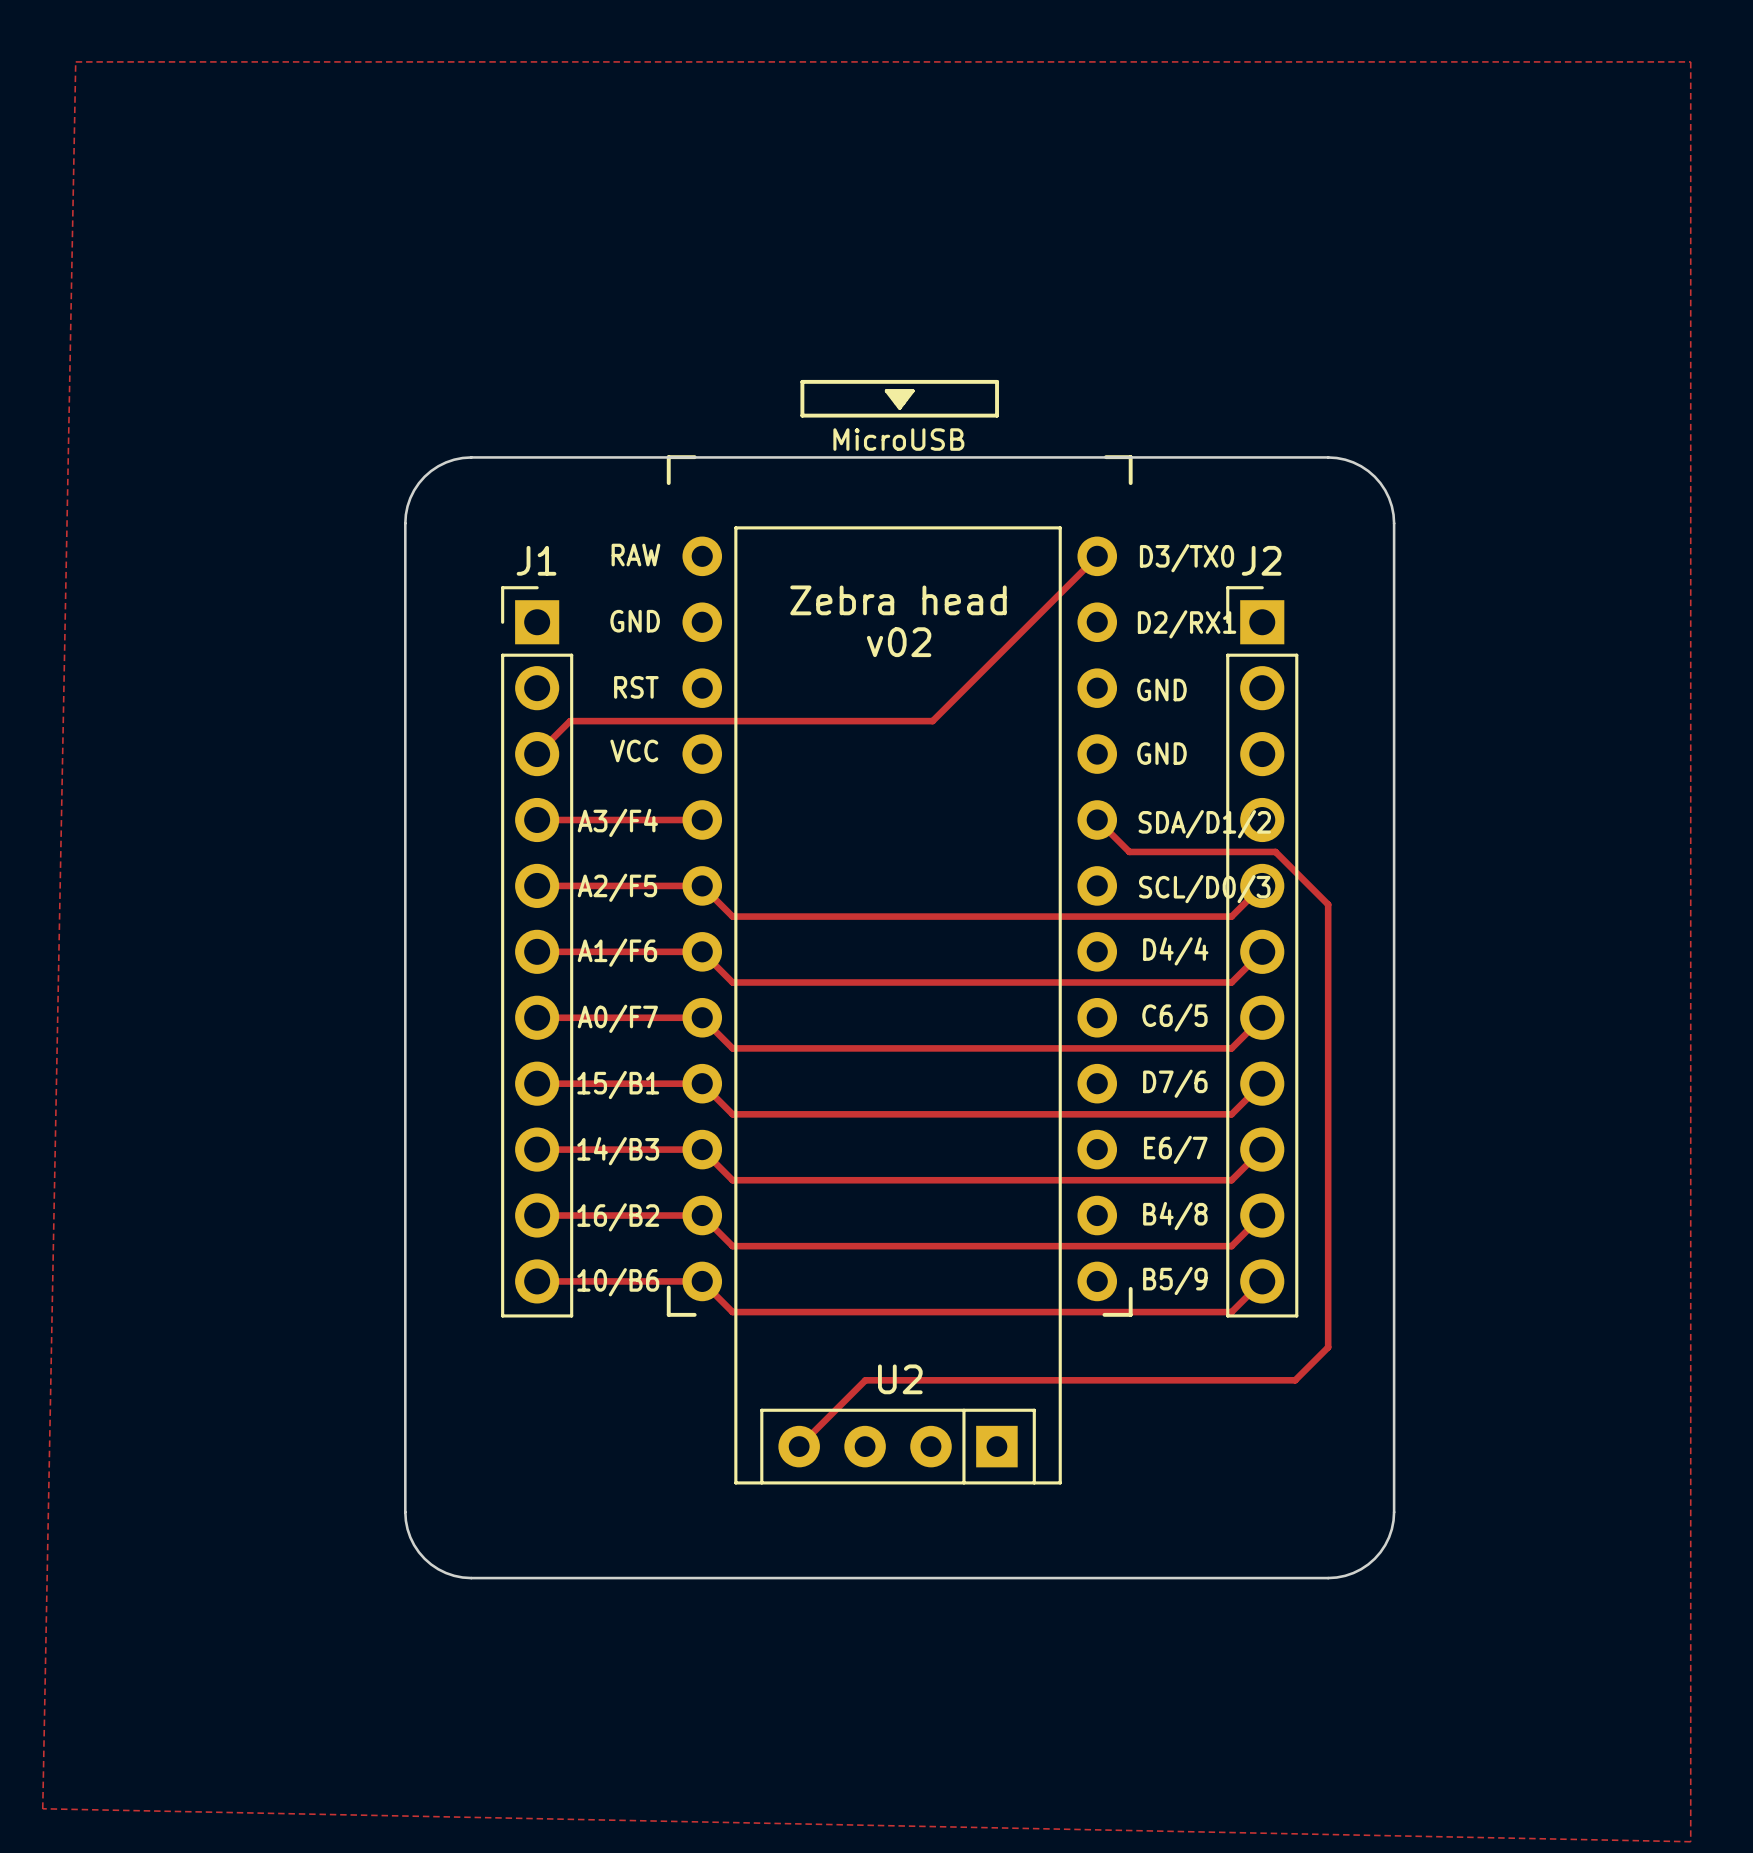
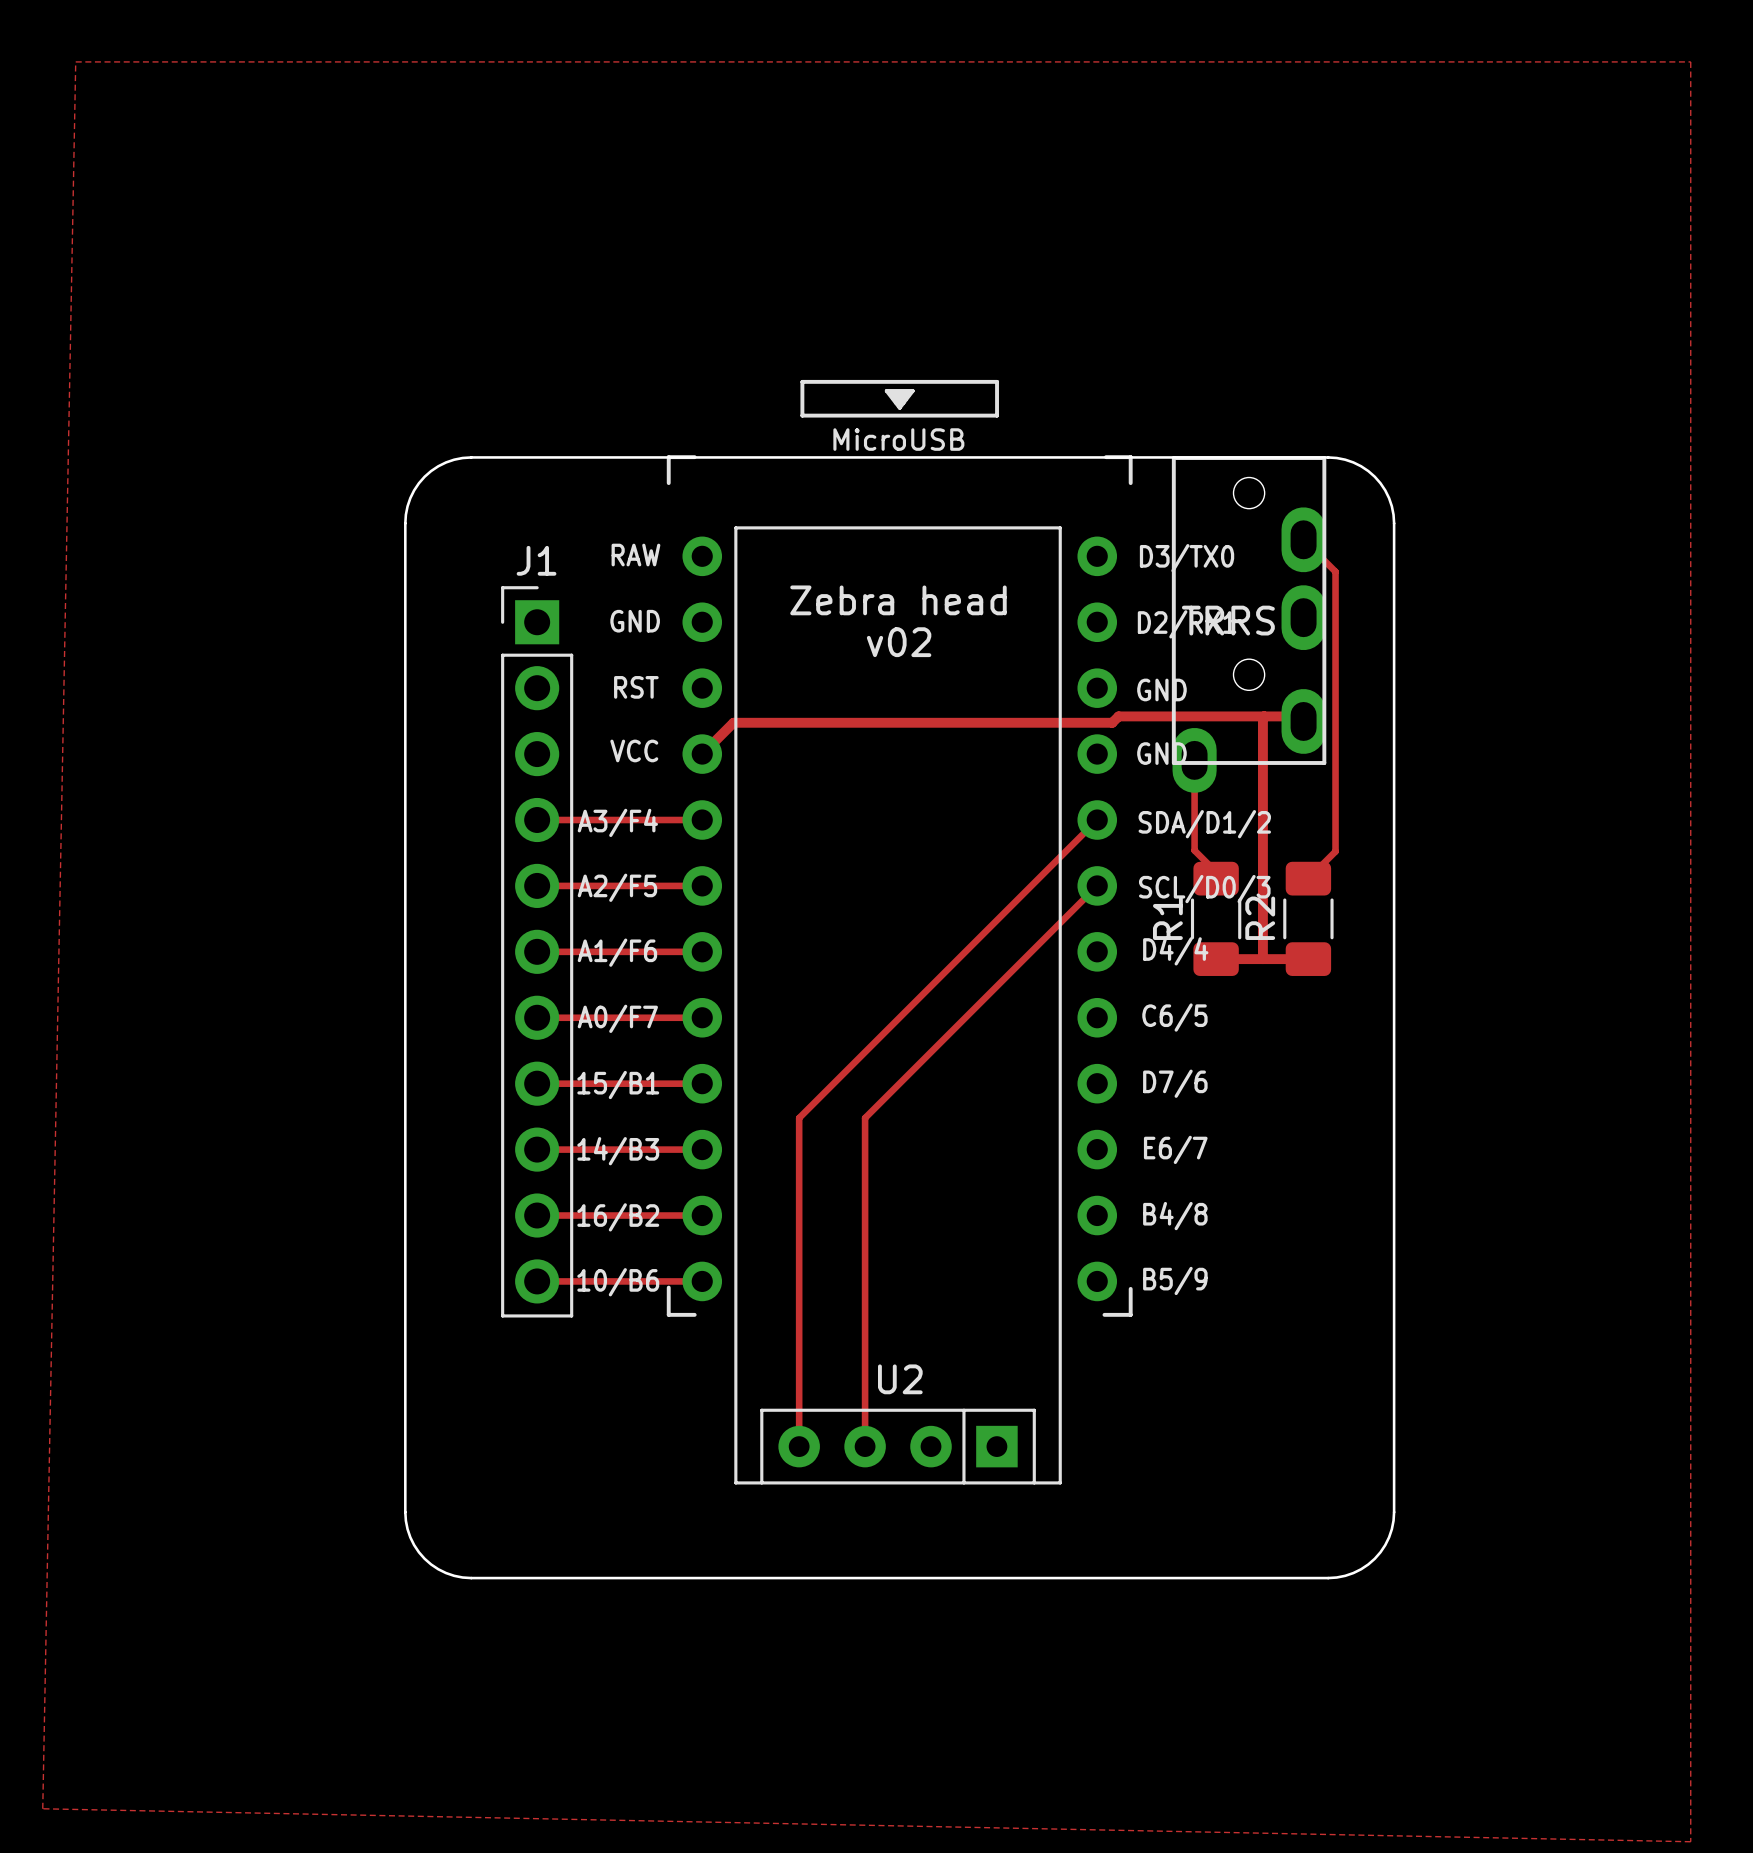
track: none -> (1303, 539) (1335, 571) (1335, 851) (1308, 878)
track: (1097, 556) (932, 721) (570, 721) (537, 754) -> none
part: none -> (1249, 624)
track: none -> (1264, 716) (1262, 959)
track: none -> (1303, 721) (1298, 716) (1118, 716) (1112, 722) (733, 722) (702, 754)
track: none -> (1194, 760) (1194, 850) (1222, 878)
track: (1097, 820) (1129, 851) (1275, 851) (1328, 904) (1328, 1347) (1295, 1380) (865, 1380) (799, 1446) -> (1097, 820) (799, 1118) (799, 1446)
track: (701, 885) (732, 916) (1231, 916) (1262, 885) -> none
track: none -> (1097, 885) (865, 1118) (865, 1446)
R1: none -> (1216, 918)
R2: none -> (1308, 918)
track: (701, 951) (732, 982) (1231, 982) (1262, 951) -> none
J2: (1262, 951) -> none
track: none -> (1222, 959) (1308, 959)
track: (701, 1017) (732, 1048) (1231, 1048) (1262, 1017) -> none
track: (701, 1083) (732, 1114) (1231, 1114) (1262, 1083) -> none
track: (701, 1149) (732, 1180) (1231, 1180) (1262, 1149) -> none
track: (701, 1215) (732, 1246) (1231, 1246) (1262, 1215) -> none
track: (701, 1281) (732, 1312) (1231, 1312) (1262, 1281) -> none

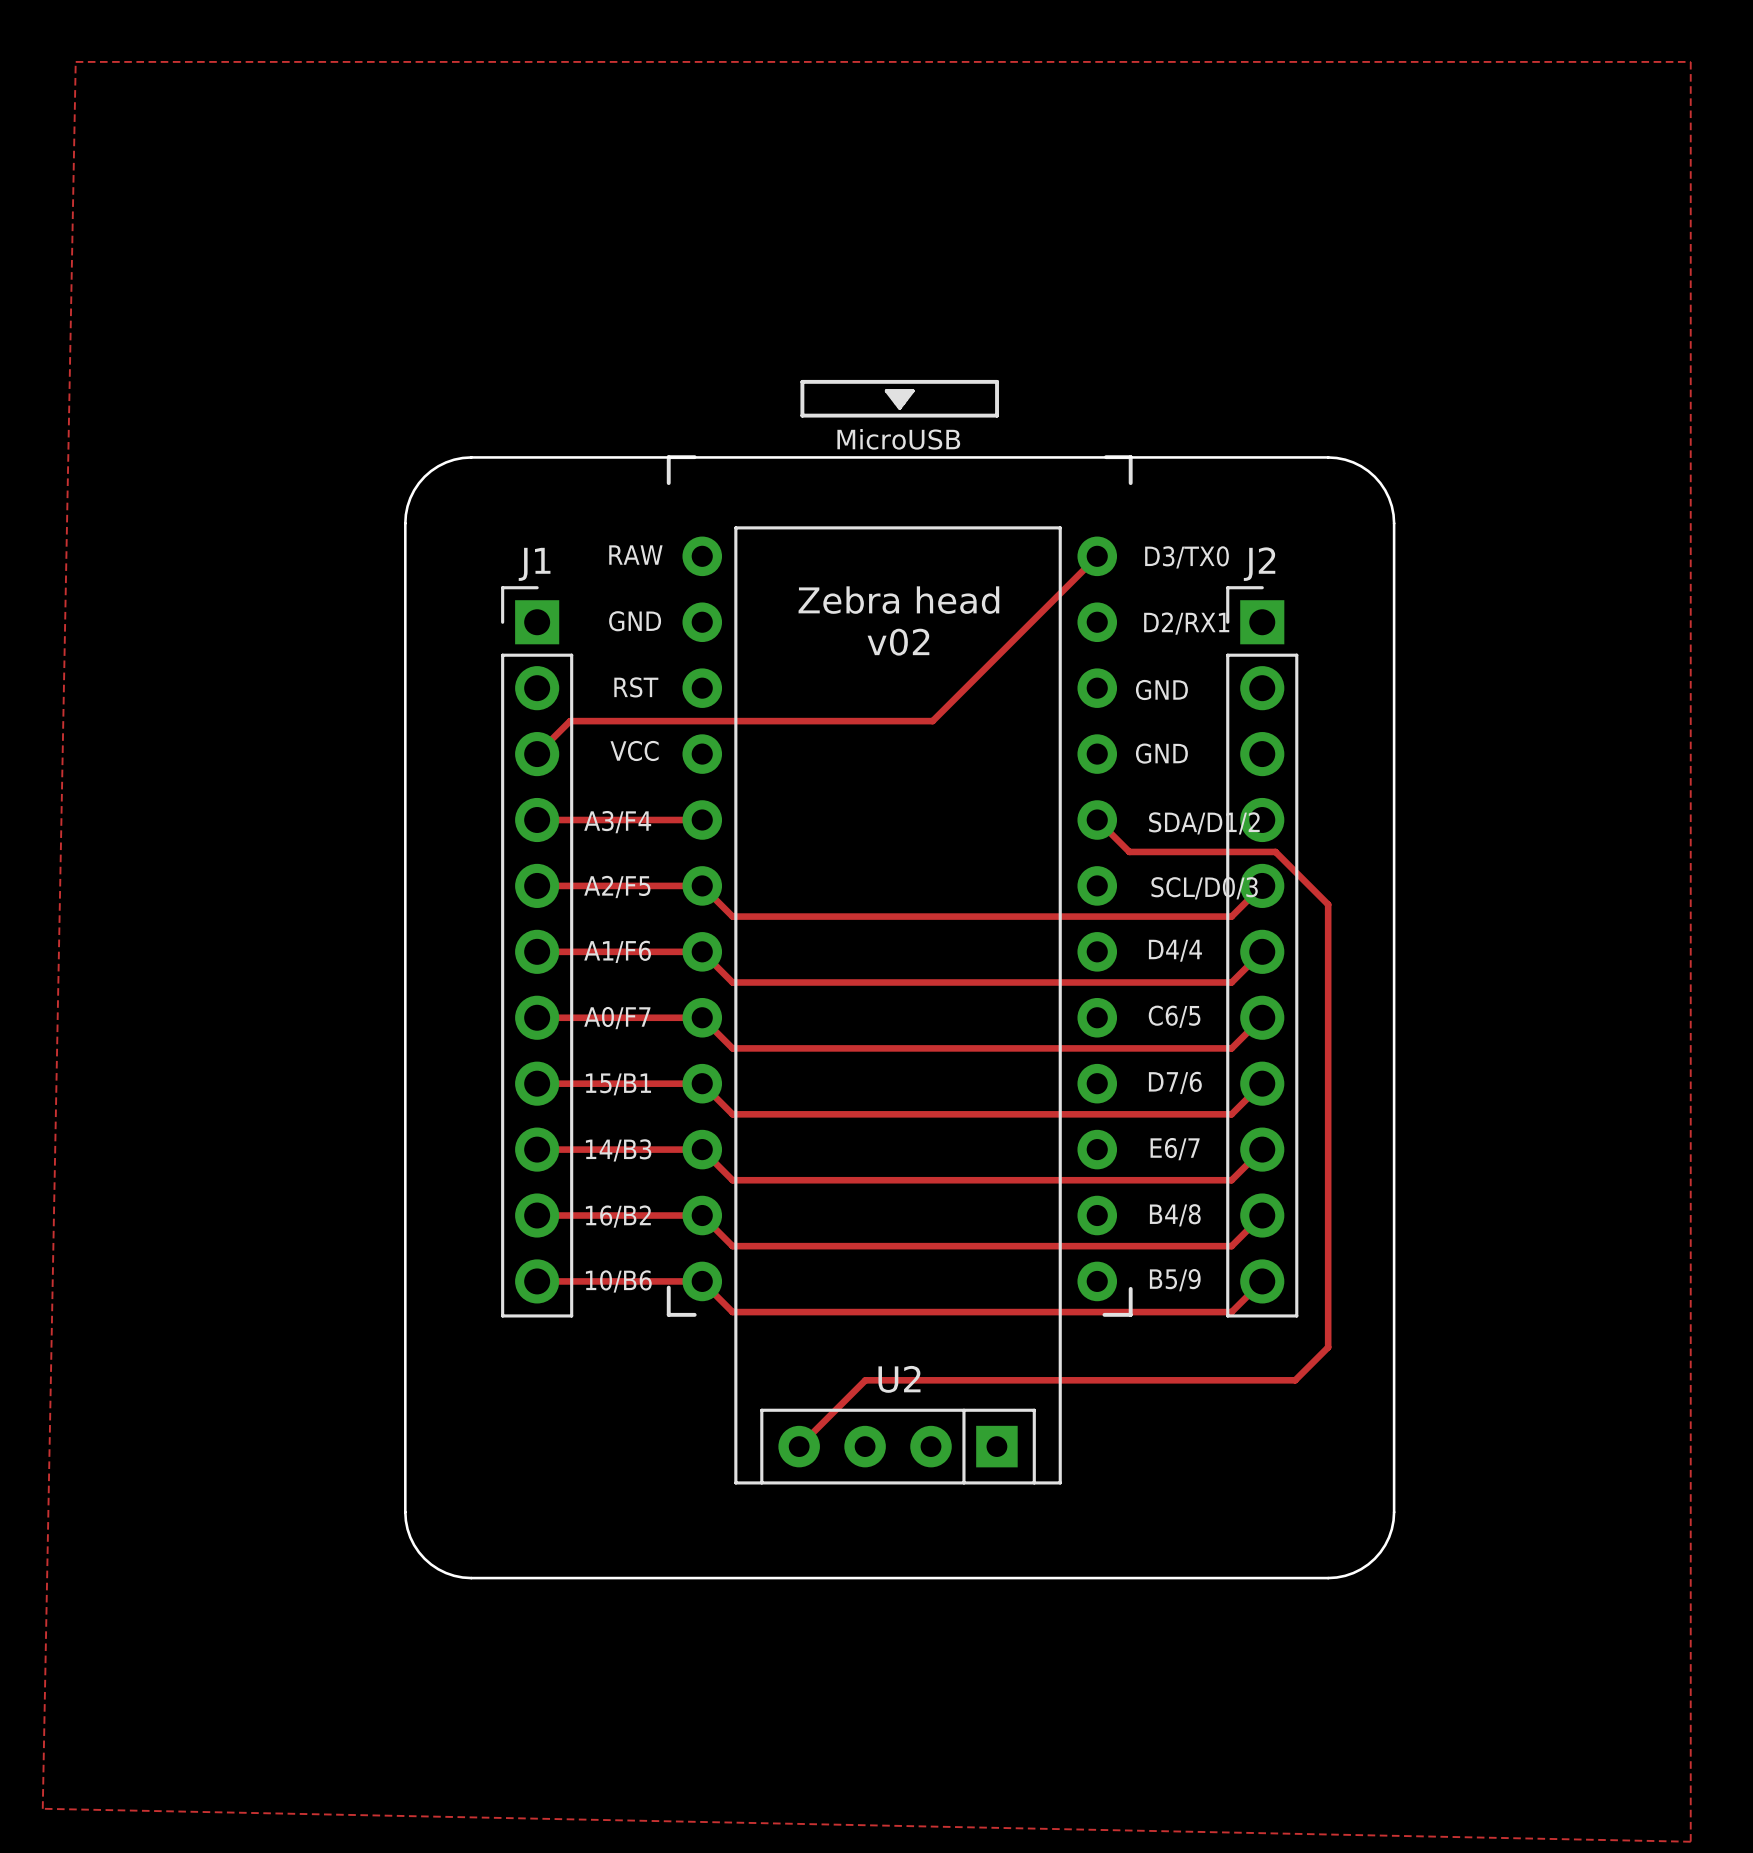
track: (1303, 539) (1335, 571) (1335, 851) (1308, 878) -> none
track: none -> (1097, 556) (932, 721) (570, 721) (537, 754)
part: (1249, 624) -> none
track: (1264, 716) (1262, 959) -> none
track: (1303, 721) (1298, 716) (1118, 716) (1112, 722) (733, 722) (702, 754) -> none
track: (1194, 760) (1194, 850) (1222, 878) -> none
track: (1097, 820) (799, 1118) (799, 1446) -> (1097, 820) (1129, 851) (1275, 851) (1328, 904) (1328, 1347) (1295, 1380) (865, 1380) (799, 1446)
track: none -> (701, 885) (732, 916) (1231, 916) (1262, 885)
track: (1097, 885) (865, 1118) (865, 1446) -> none
R1: (1216, 918) -> none
R2: (1308, 918) -> none
track: none -> (701, 951) (732, 982) (1231, 982) (1262, 951)
J2: none -> (1262, 951)
track: (1222, 959) (1308, 959) -> none
track: none -> (701, 1017) (732, 1048) (1231, 1048) (1262, 1017)
track: none -> (701, 1083) (732, 1114) (1231, 1114) (1262, 1083)
track: none -> (701, 1149) (732, 1180) (1231, 1180) (1262, 1149)
track: none -> (701, 1215) (732, 1246) (1231, 1246) (1262, 1215)
track: none -> (701, 1281) (732, 1312) (1231, 1312) (1262, 1281)

